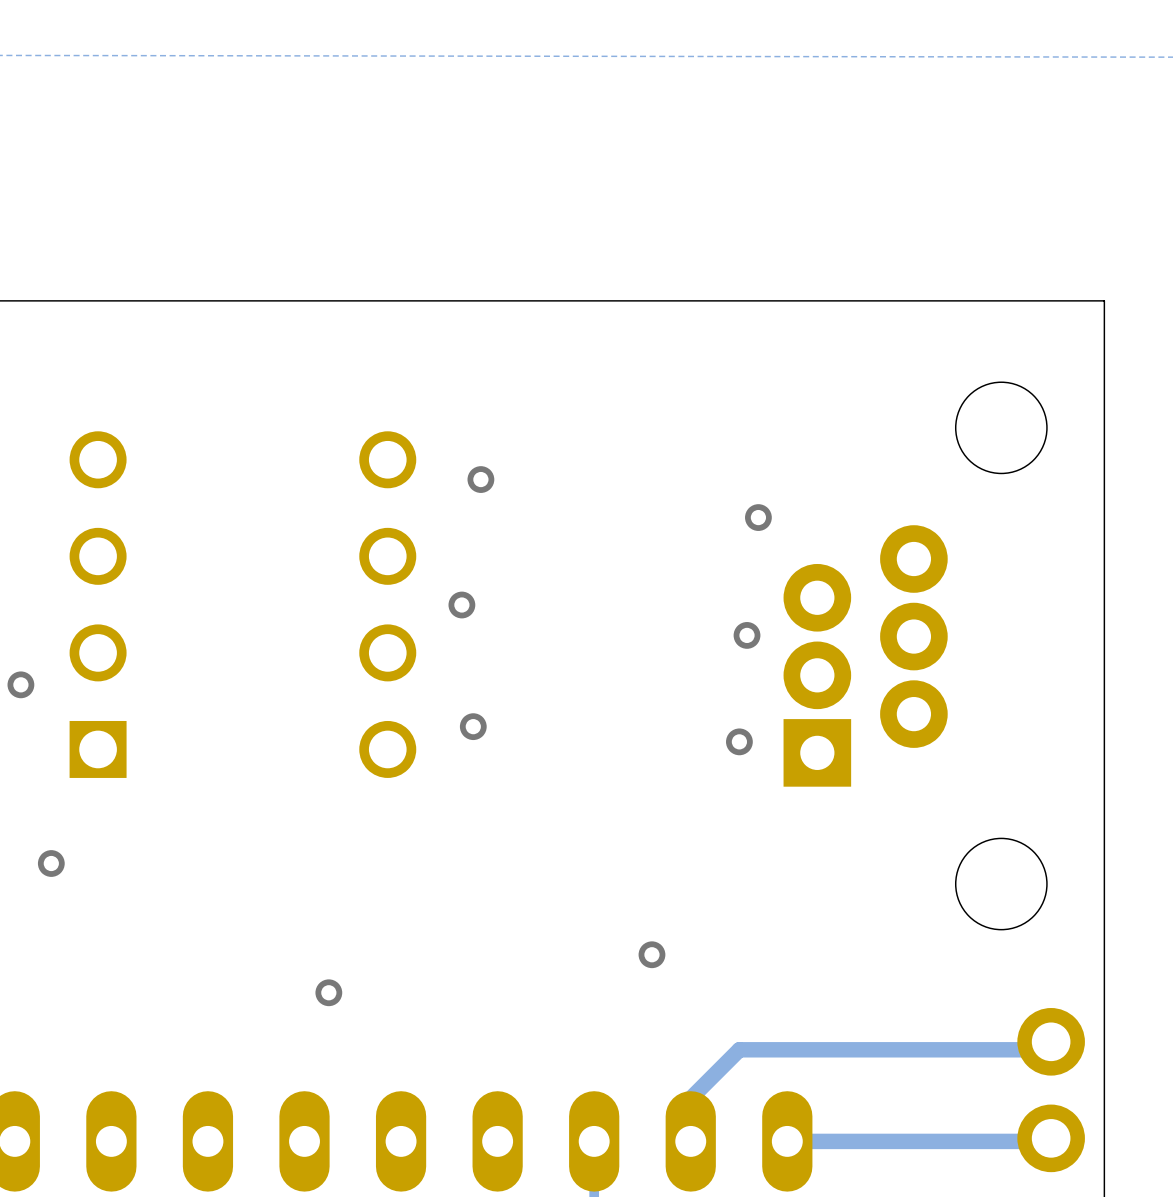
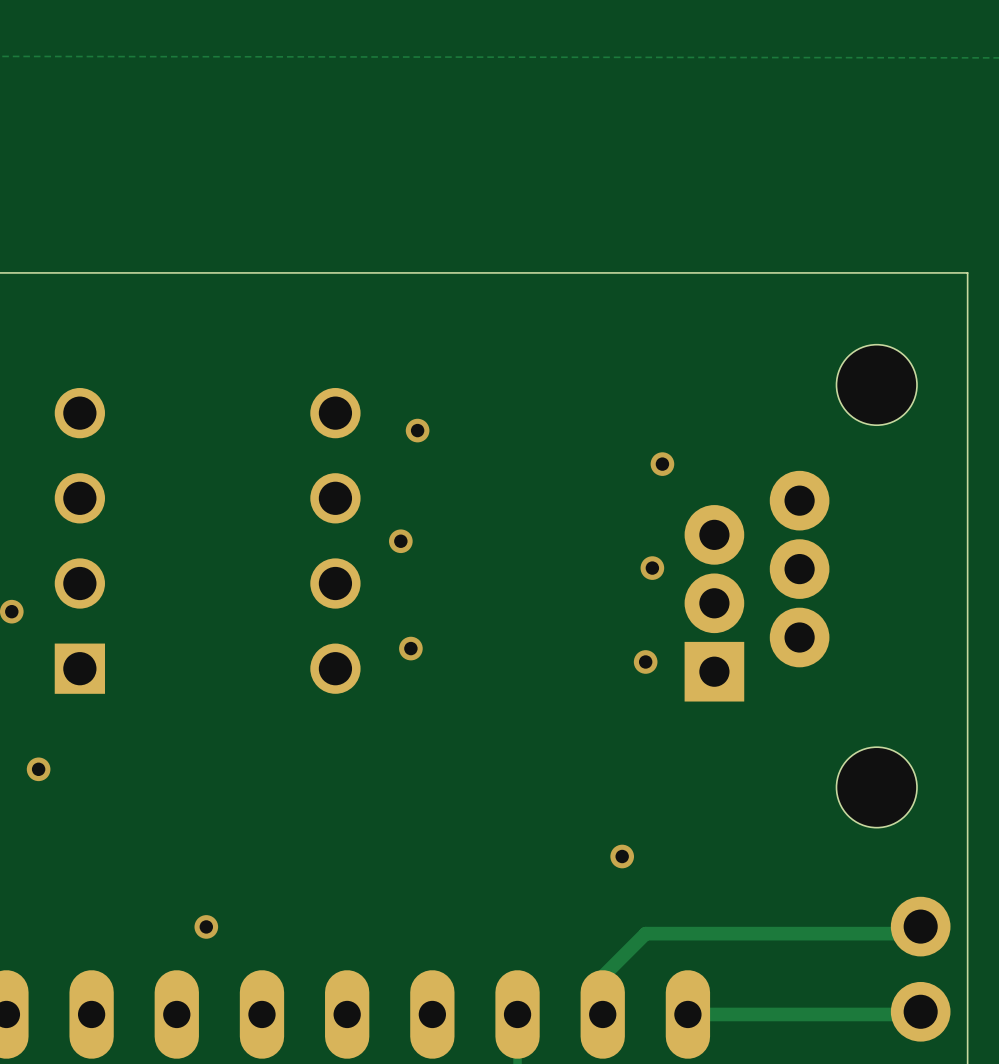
via position: (651, 954) -> (622, 856)
via position: (328, 992) -> (206, 926)

